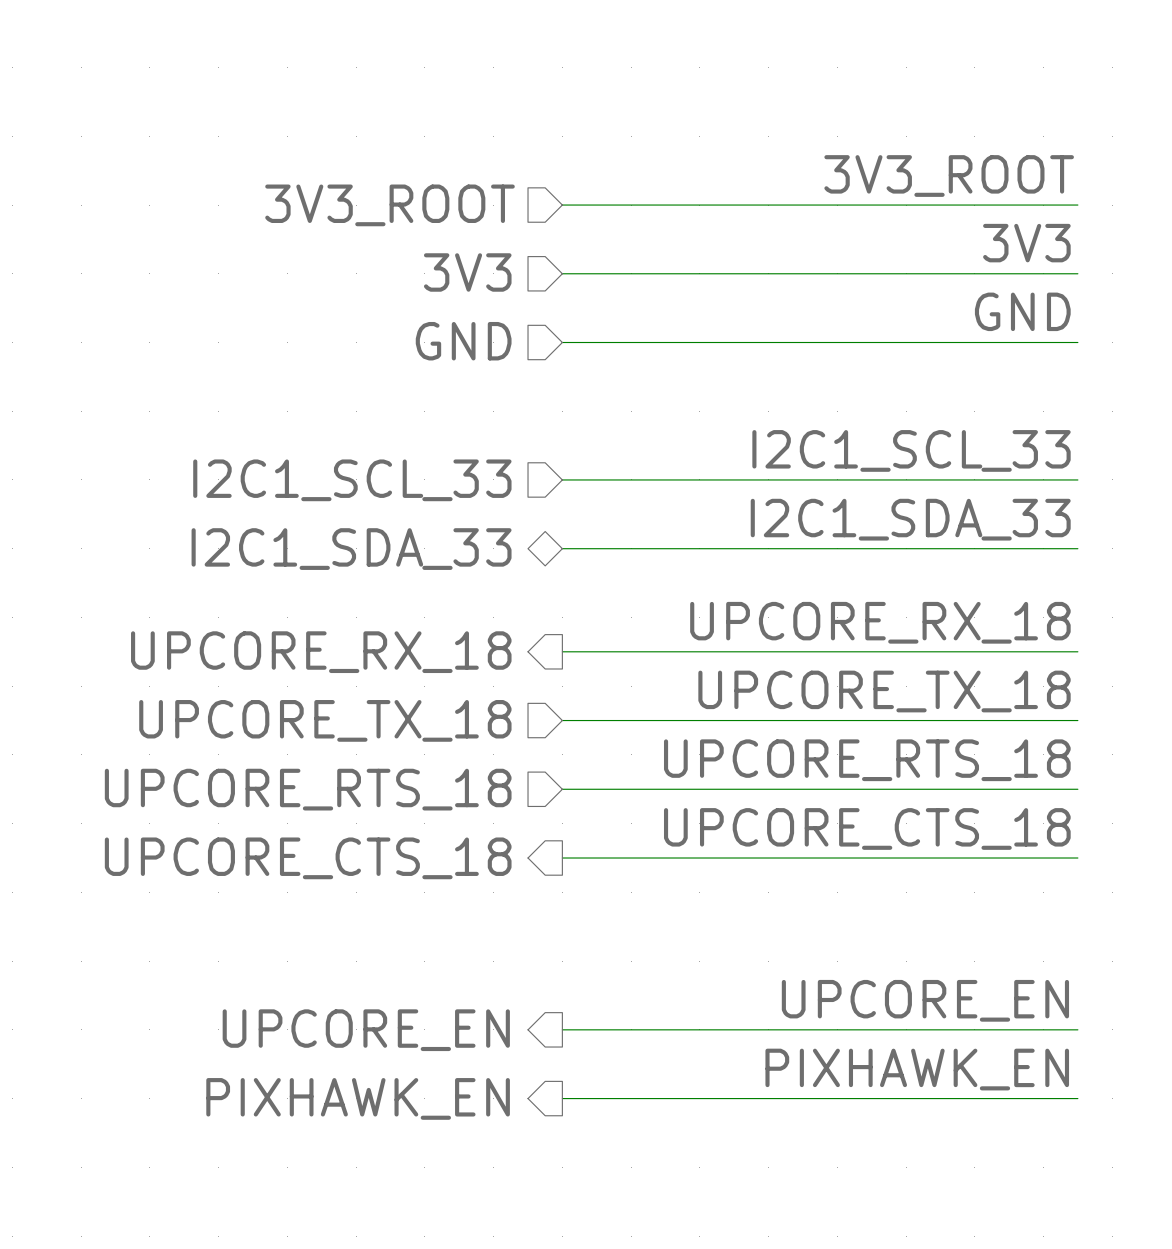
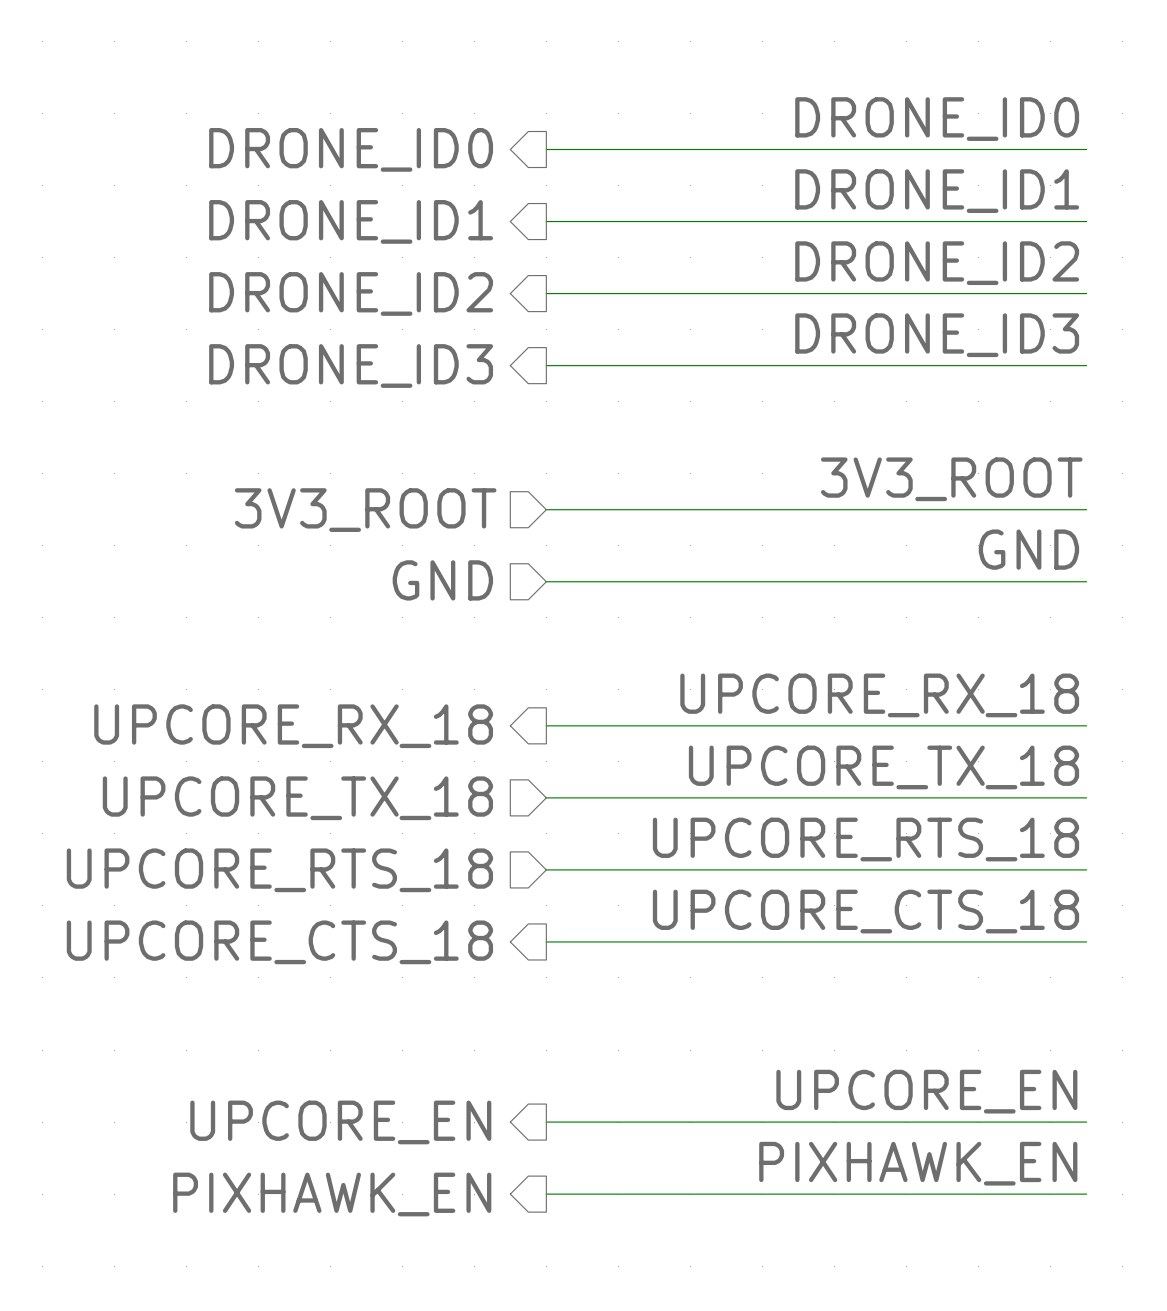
label: none -> DRONE_ID0 (937, 119)
wire: none -> (546, 149) (1086, 149)
hierarchical label: none -> DRONE_ID0 (351, 149)
label: none -> DRONE_ID1 (937, 191)
hierarchical label: none -> DRONE_ID1 (351, 221)
label position: 3V3_ROOT (949, 176) -> 3V3_ROOT (951, 479)
hierarchical label position: 3V3_ROOT (390, 205) -> 3V3_ROOT (365, 510)
wire: (562, 205) (1077, 205) -> (546, 221) (1086, 221)
label: none -> DRONE_ID2 (937, 263)
hierarchical label: none -> DRONE_ID2 (351, 293)
label: 3V3 (1026, 243) -> none
hierarchical label: 3V3 (467, 272) -> none
wire: (562, 273) (1077, 273) -> (546, 293) (1086, 293)
label: none -> DRONE_ID3 (937, 335)
hierarchical label: none -> DRONE_ID3 (351, 366)
label position: GND (1022, 311) -> GND (1028, 549)
hierarchical label position: GND (463, 341) -> GND (442, 580)
wire: (562, 342) (1077, 342) -> (546, 365) (1086, 365)
label: I2C1_SCL_33 (911, 450) -> none
wire: (562, 479) (1077, 479) -> (546, 509) (1086, 509)
hierarchical label: I2C1_SCL_33 (352, 480) -> none
label: I2C1_SDA_33 (910, 519) -> none
wire: (562, 548) (1077, 548) -> (546, 581) (1086, 581)
hierarchical label: I2C1_SDA_33 (351, 549) -> none

